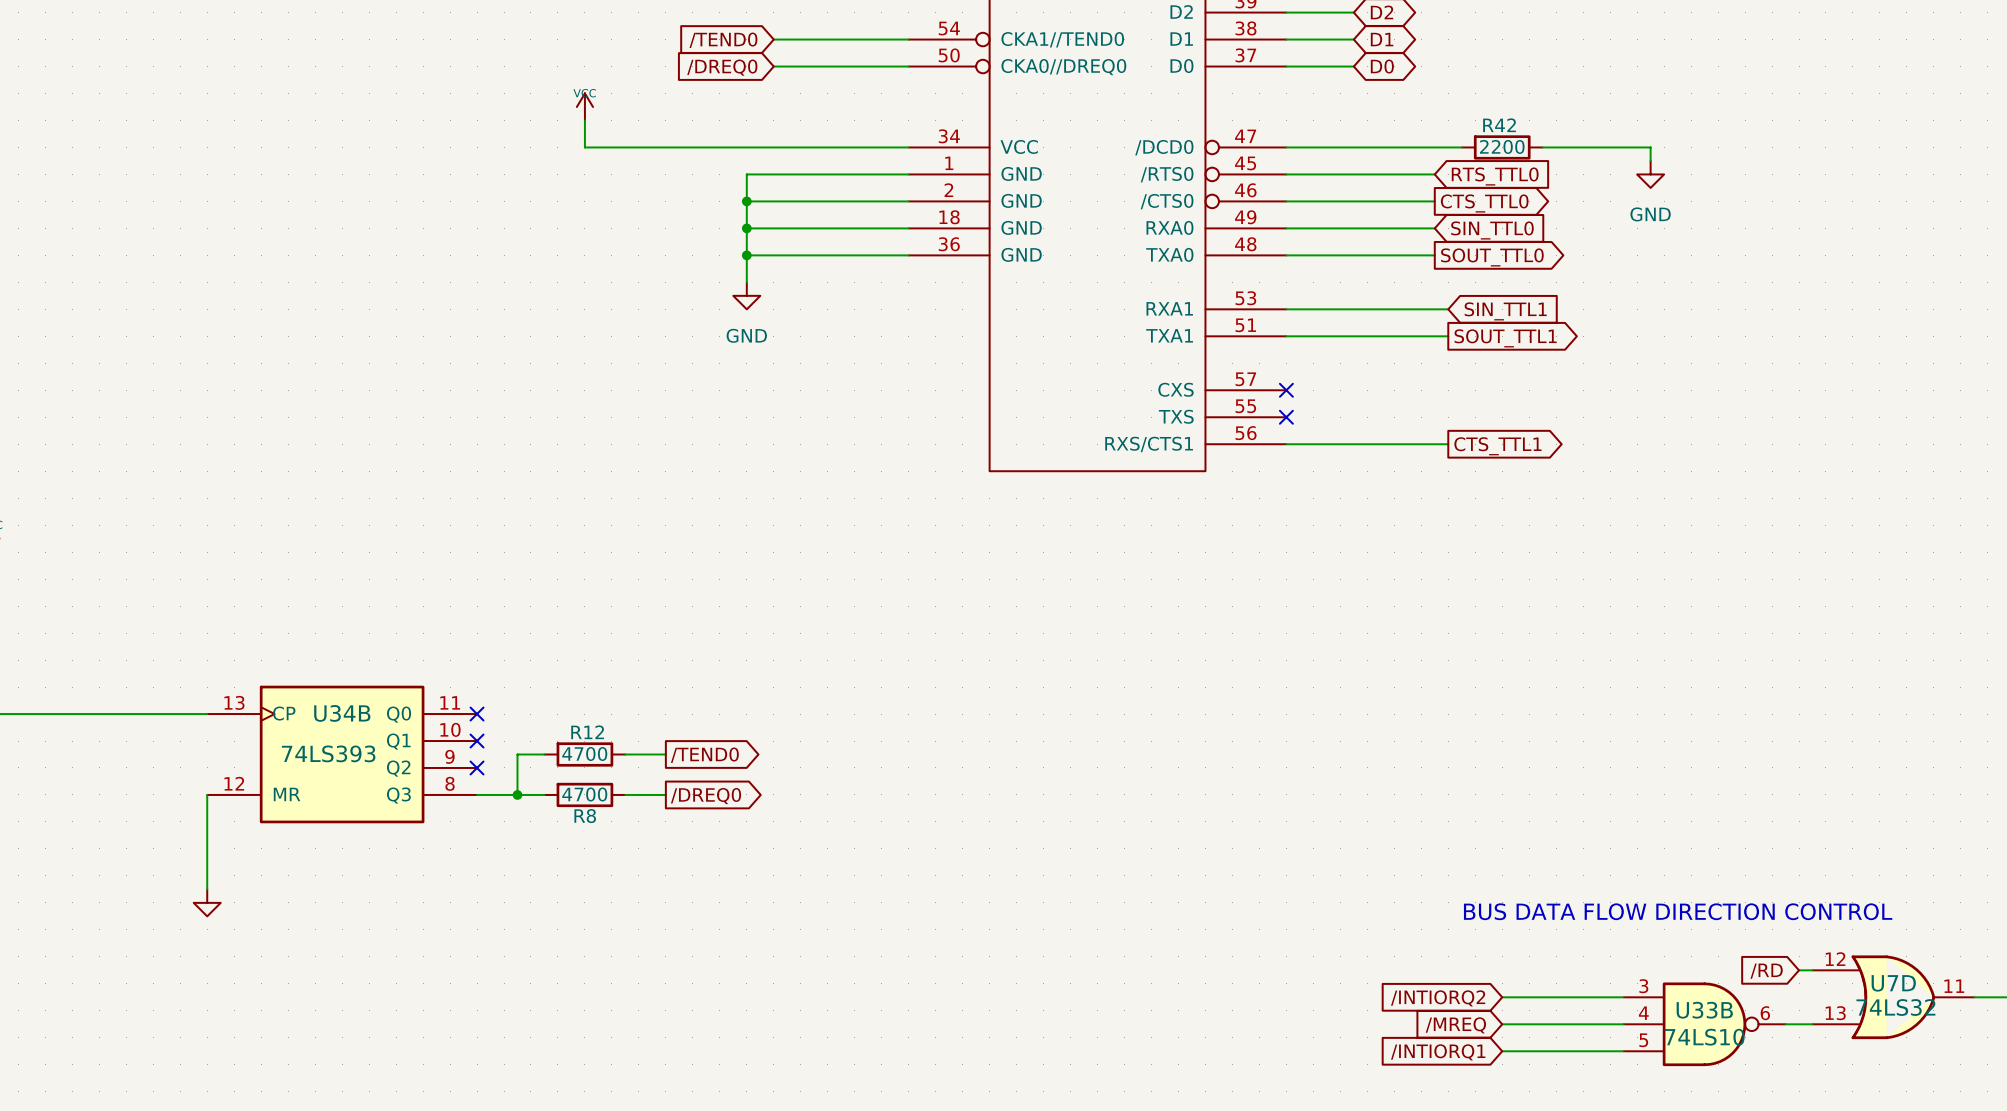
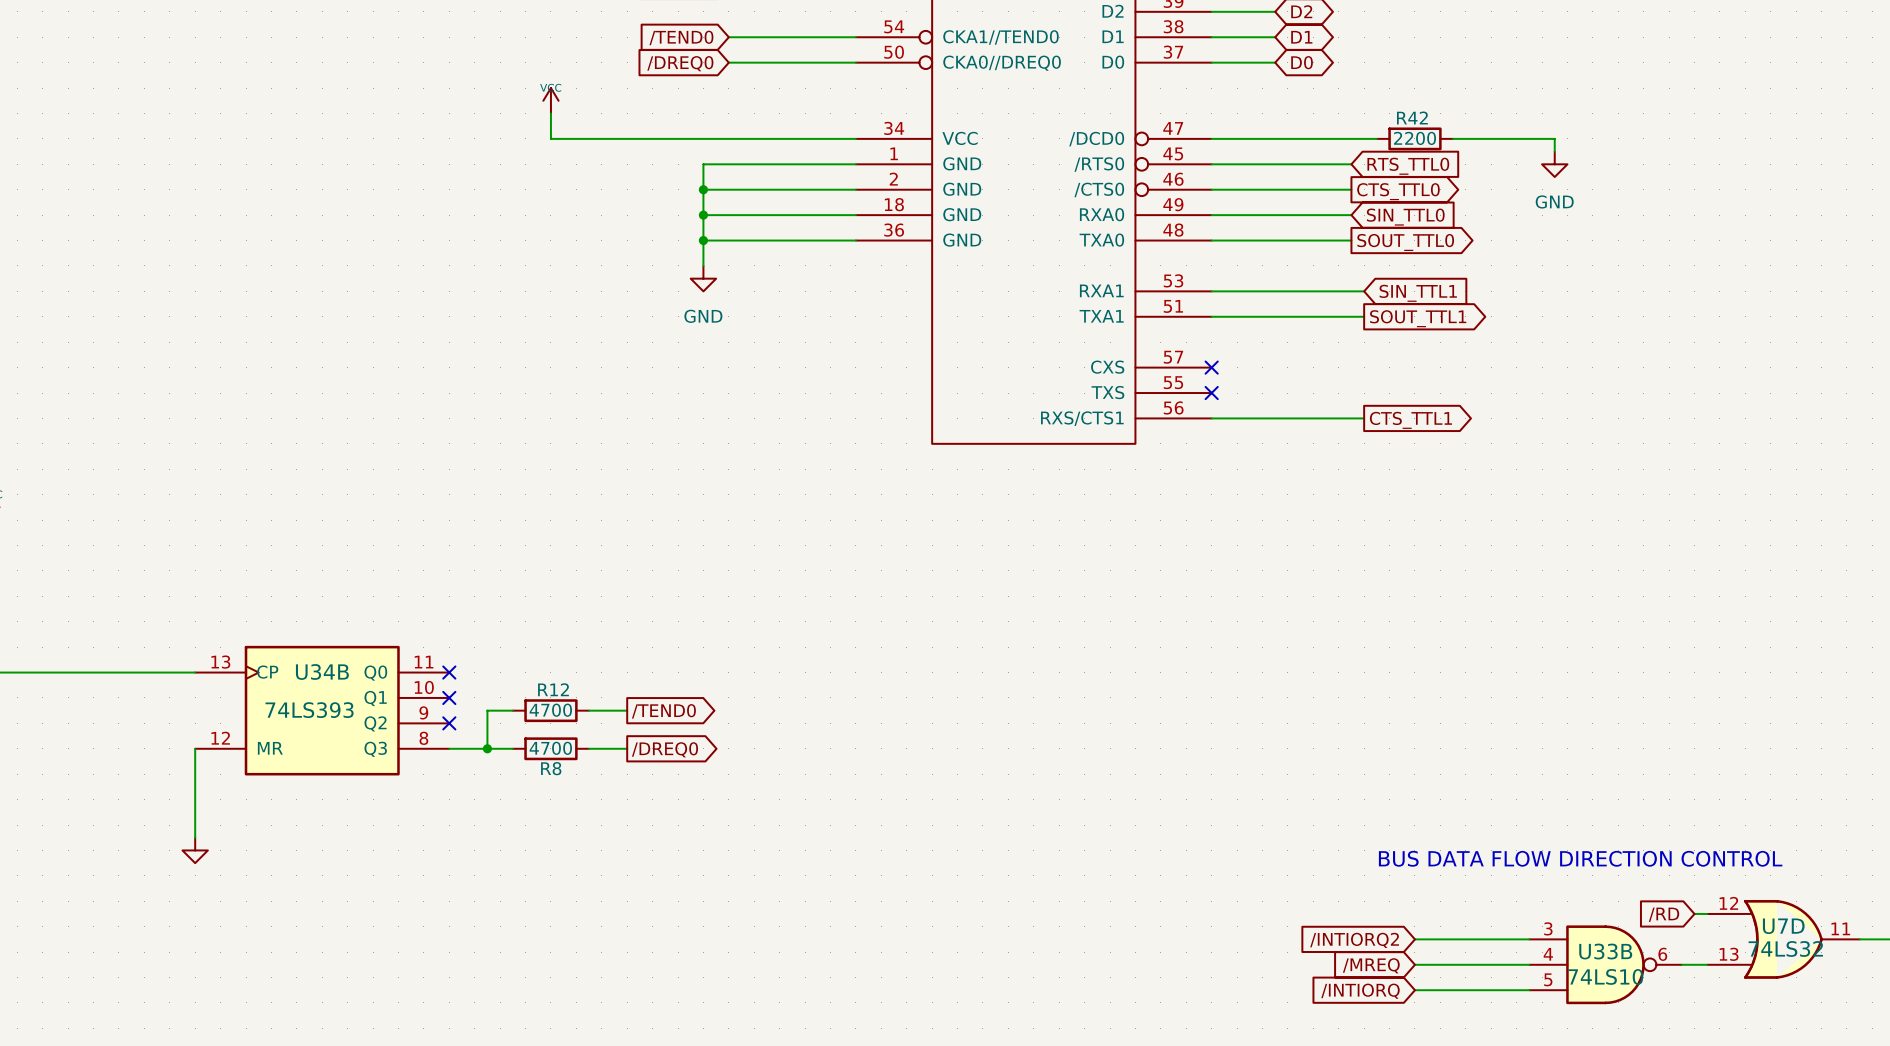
global label: /INTIORQ1 (1438, 1052) -> /INTIORQ (1360, 991)

